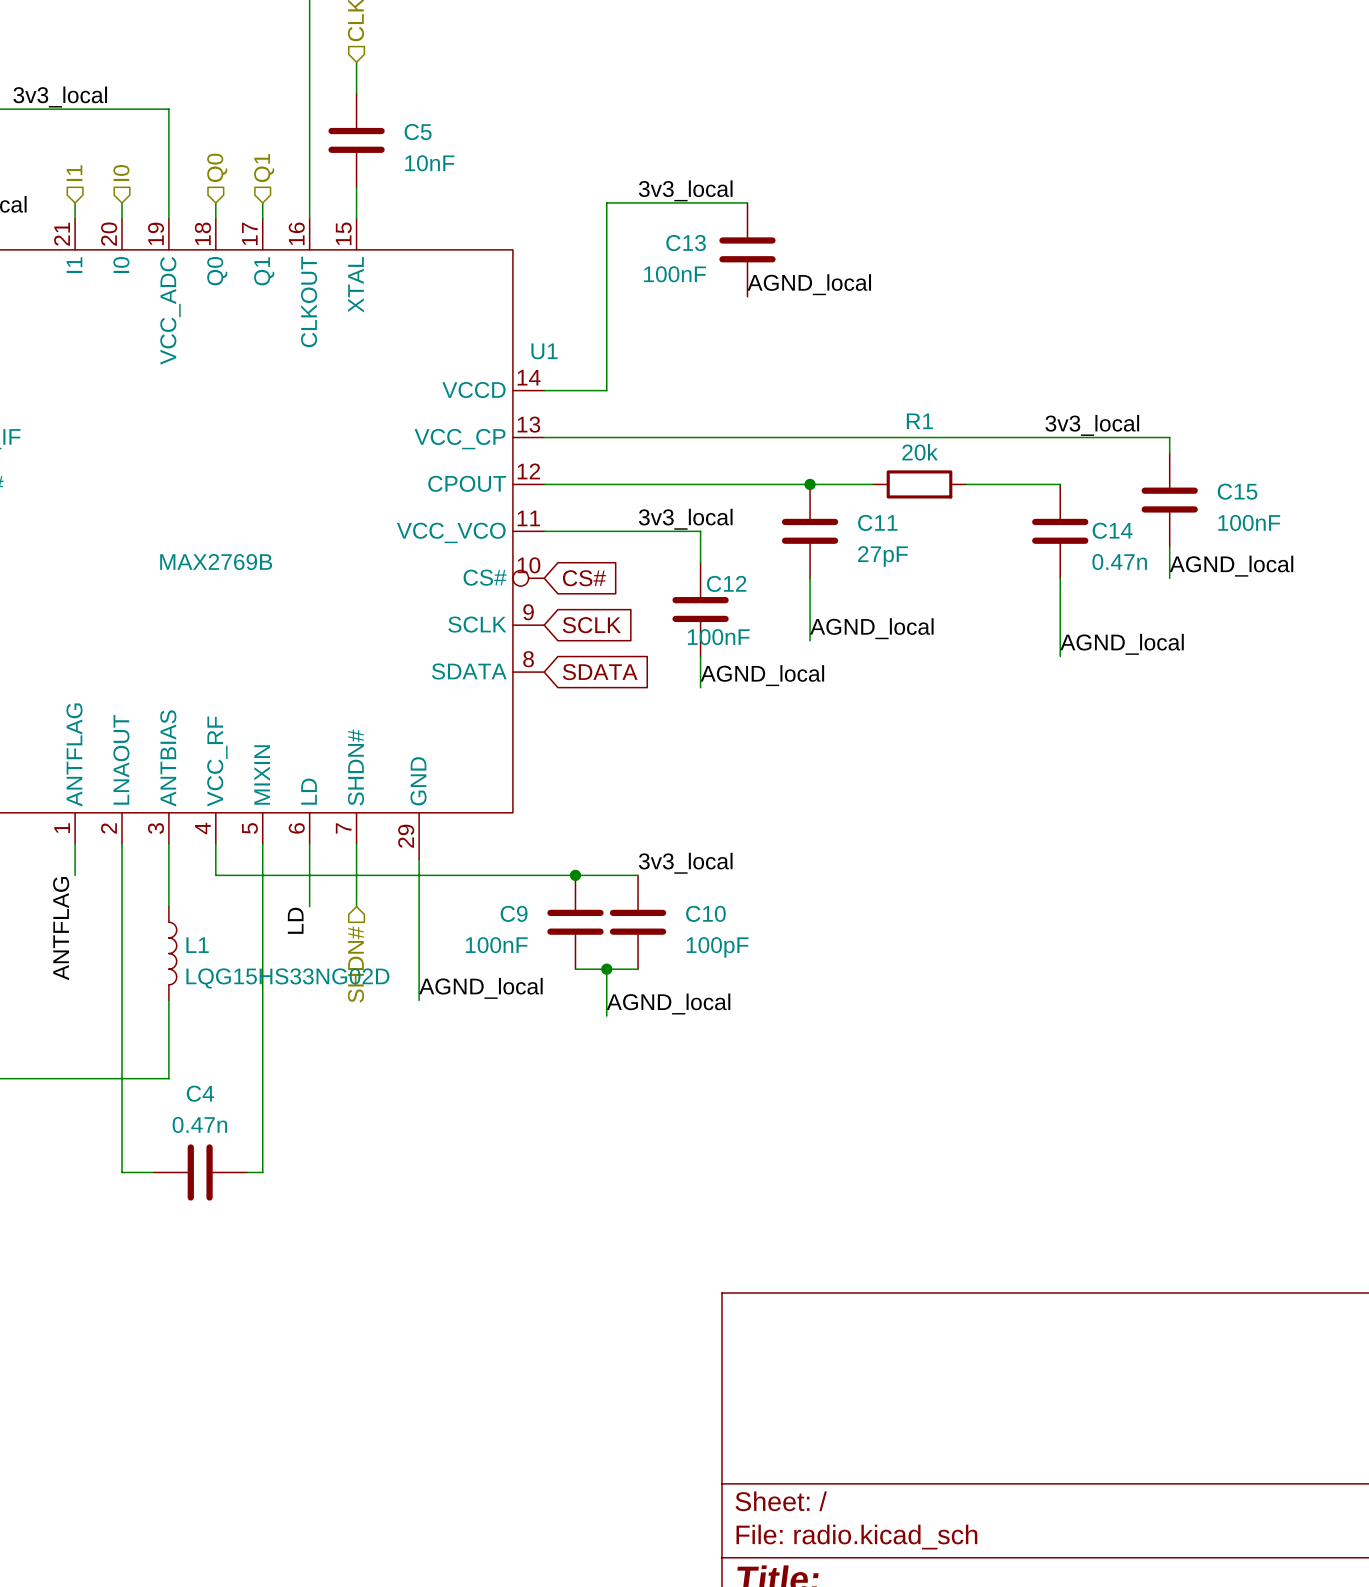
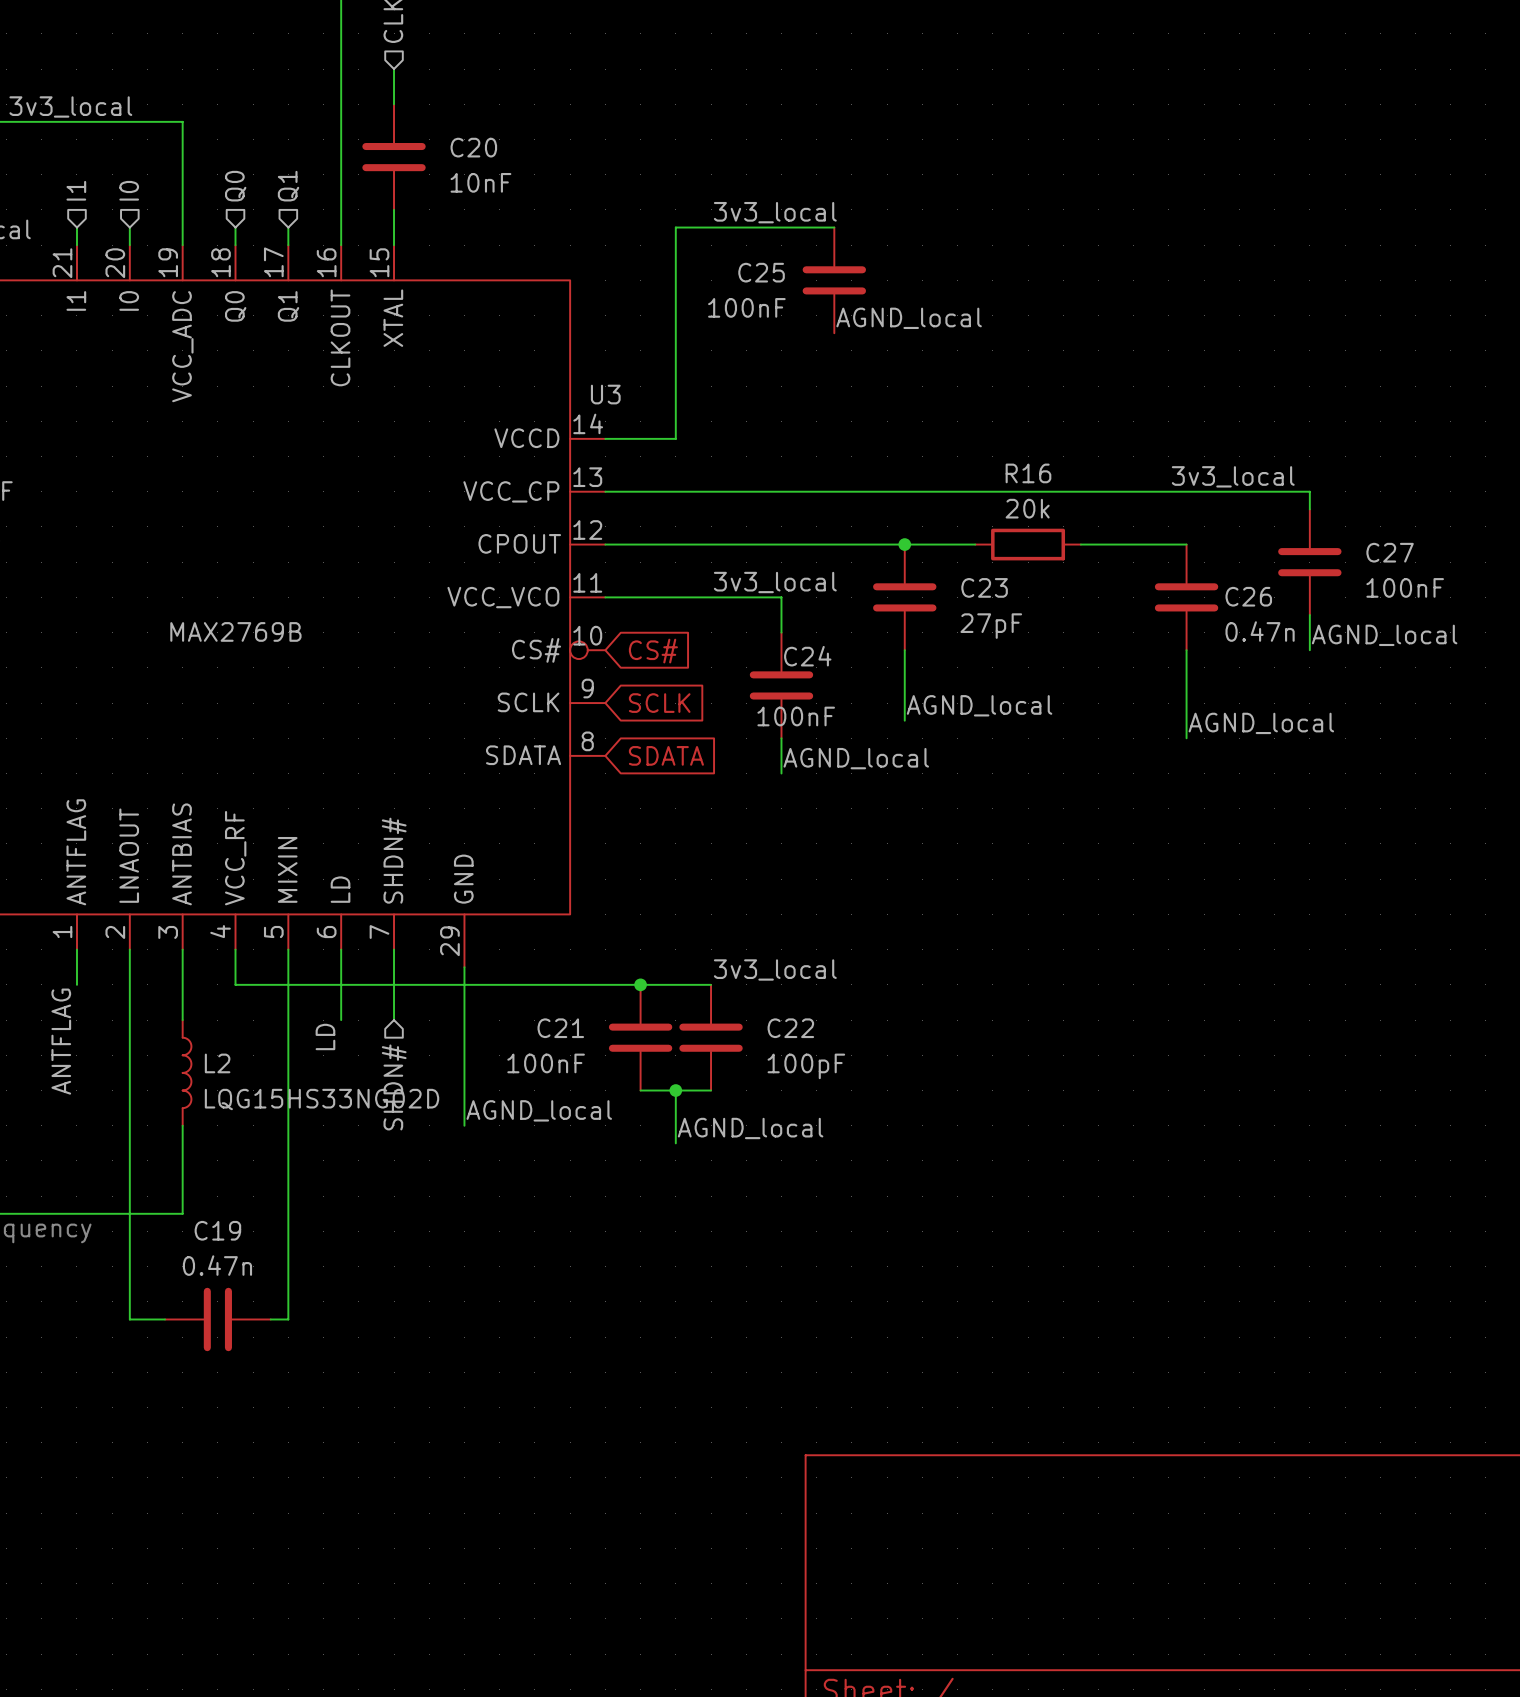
C5 name: C5 (418, 132) -> C20 (473, 147)
C13 name: C13 (686, 243) -> C25 (761, 272)
U1 name: U1 (544, 351) -> U3 (605, 394)
R1 name: R1 (919, 421) -> R16 (1028, 473)
C15 name: C15 (1237, 491) -> C27 (1390, 552)
C11 name: C11 (877, 522) -> C23 (984, 587)
C14 name: C14 (1112, 530) -> C26 (1248, 596)
C12 name: C12 (726, 583) -> C24 (807, 656)
C9 name: C9 (514, 913) -> C21 (560, 1028)
C10 name: C10 (705, 913) -> C22 (790, 1028)
L1 name: L1 (197, 945) -> L2 (217, 1063)
C4 name: C4 (200, 1093) -> C19 (217, 1230)

